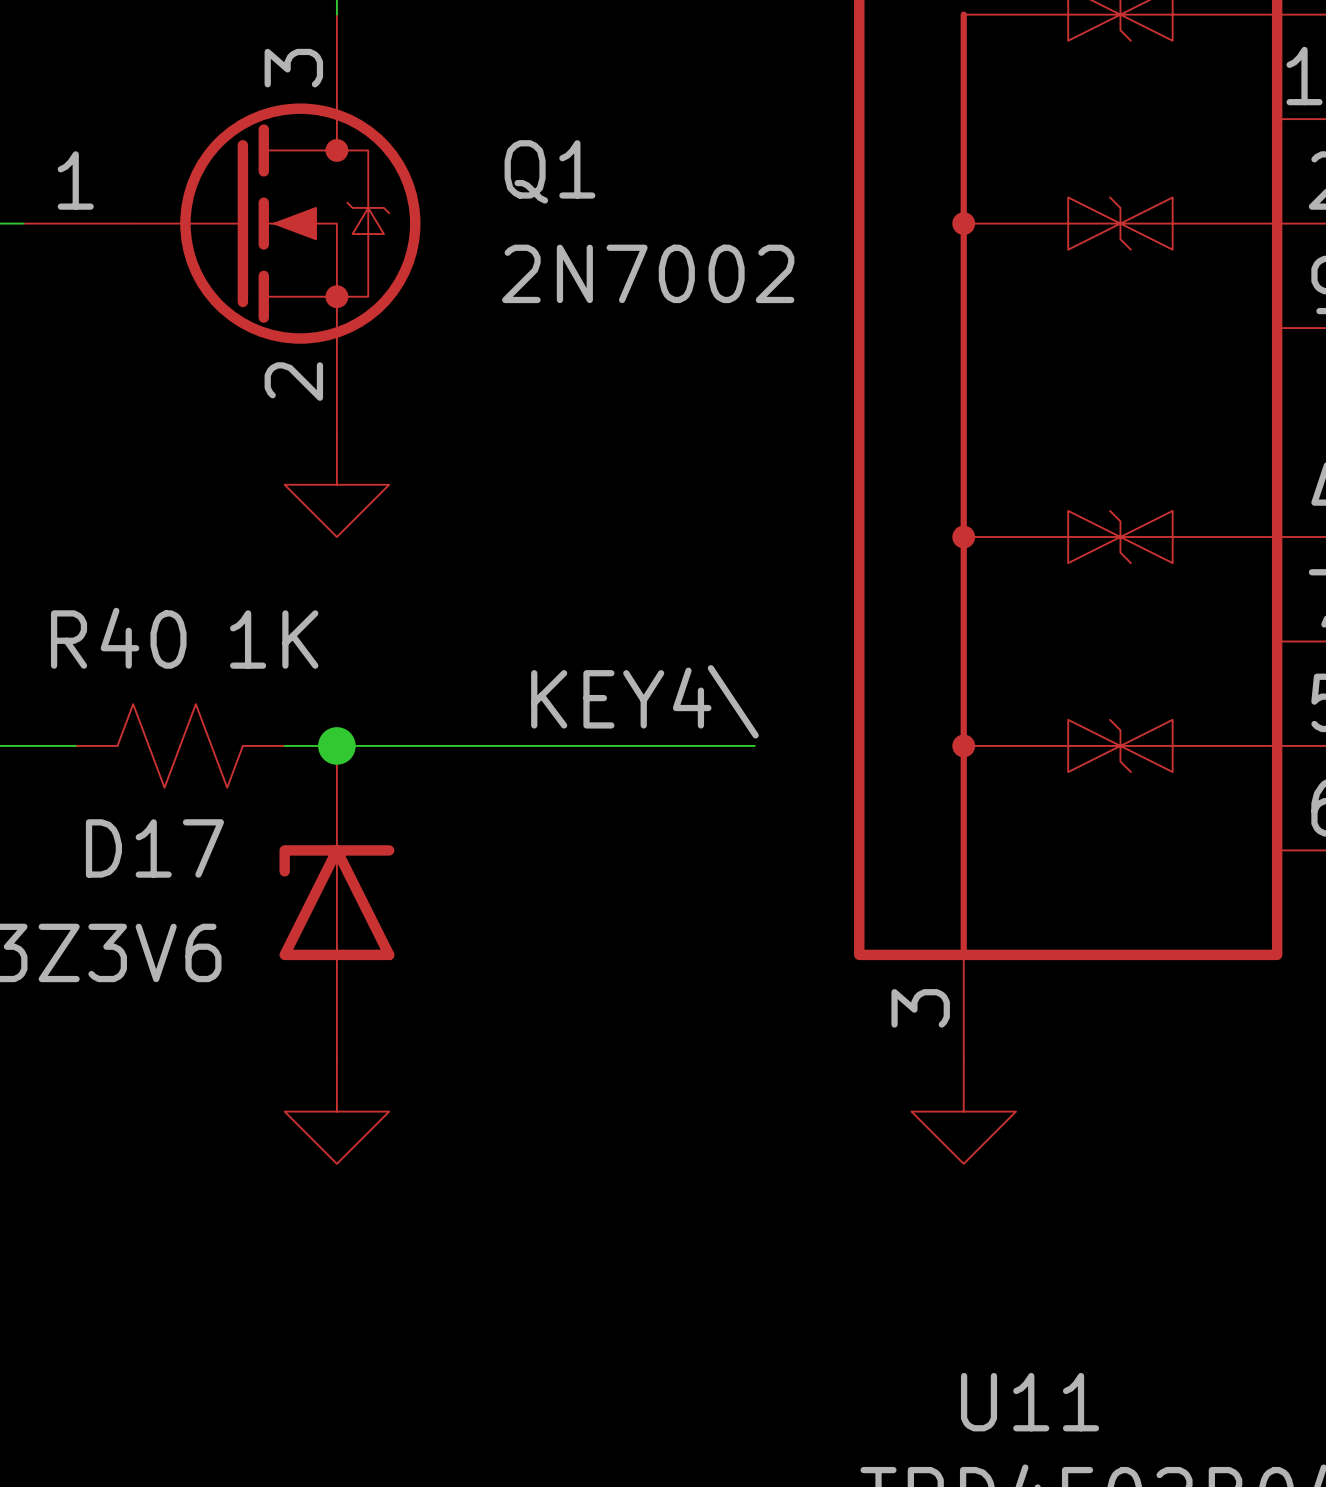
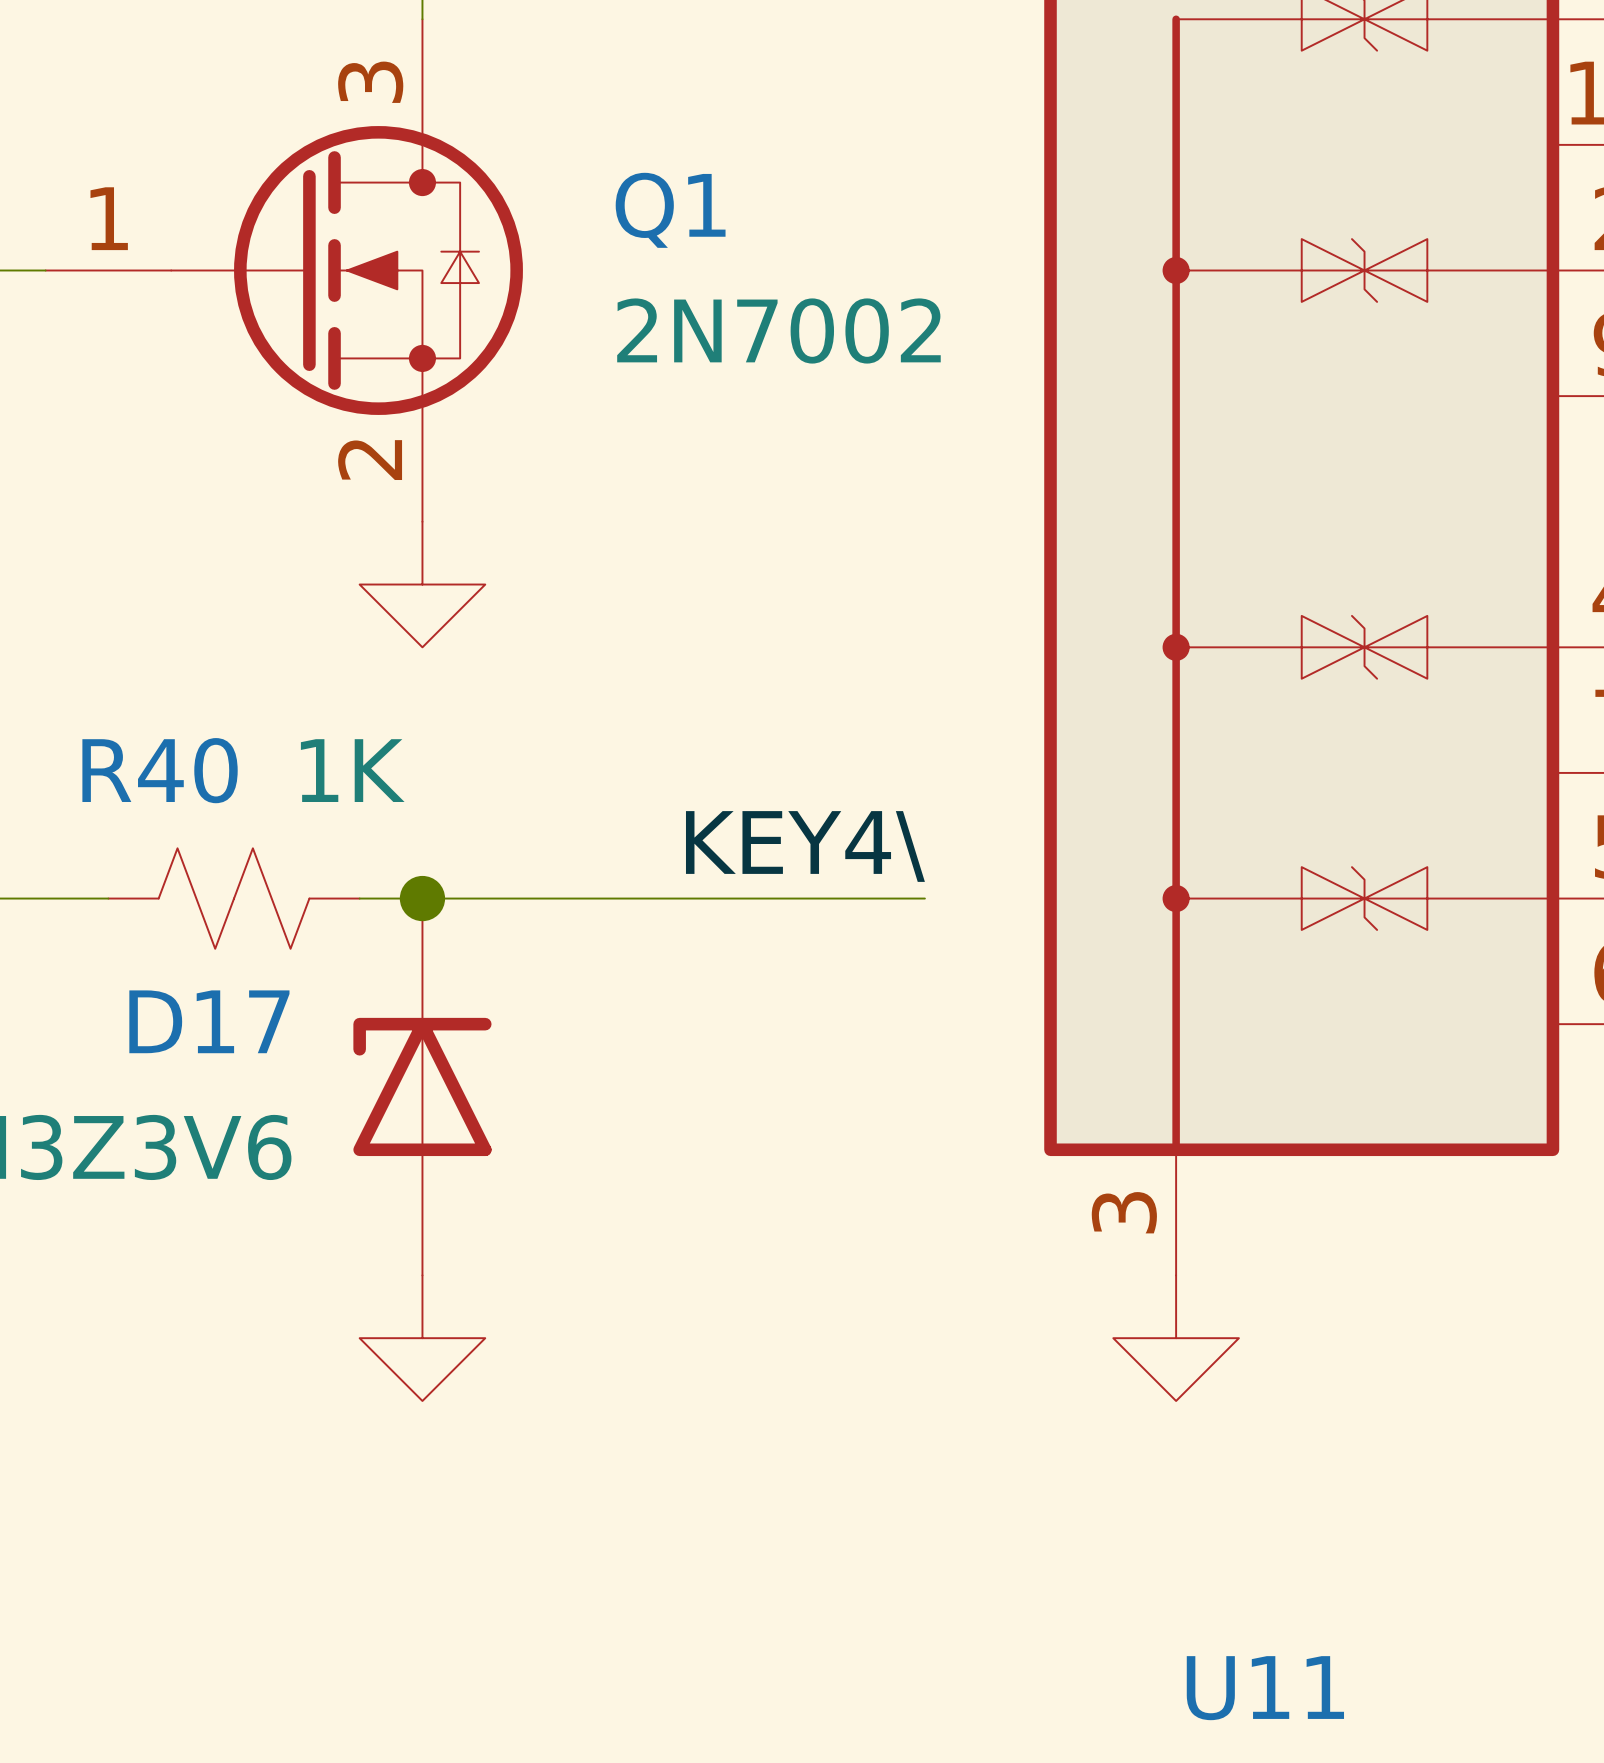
Q1 symbol: [23, 14, 421, 433] -> [45, 19, 523, 522]

